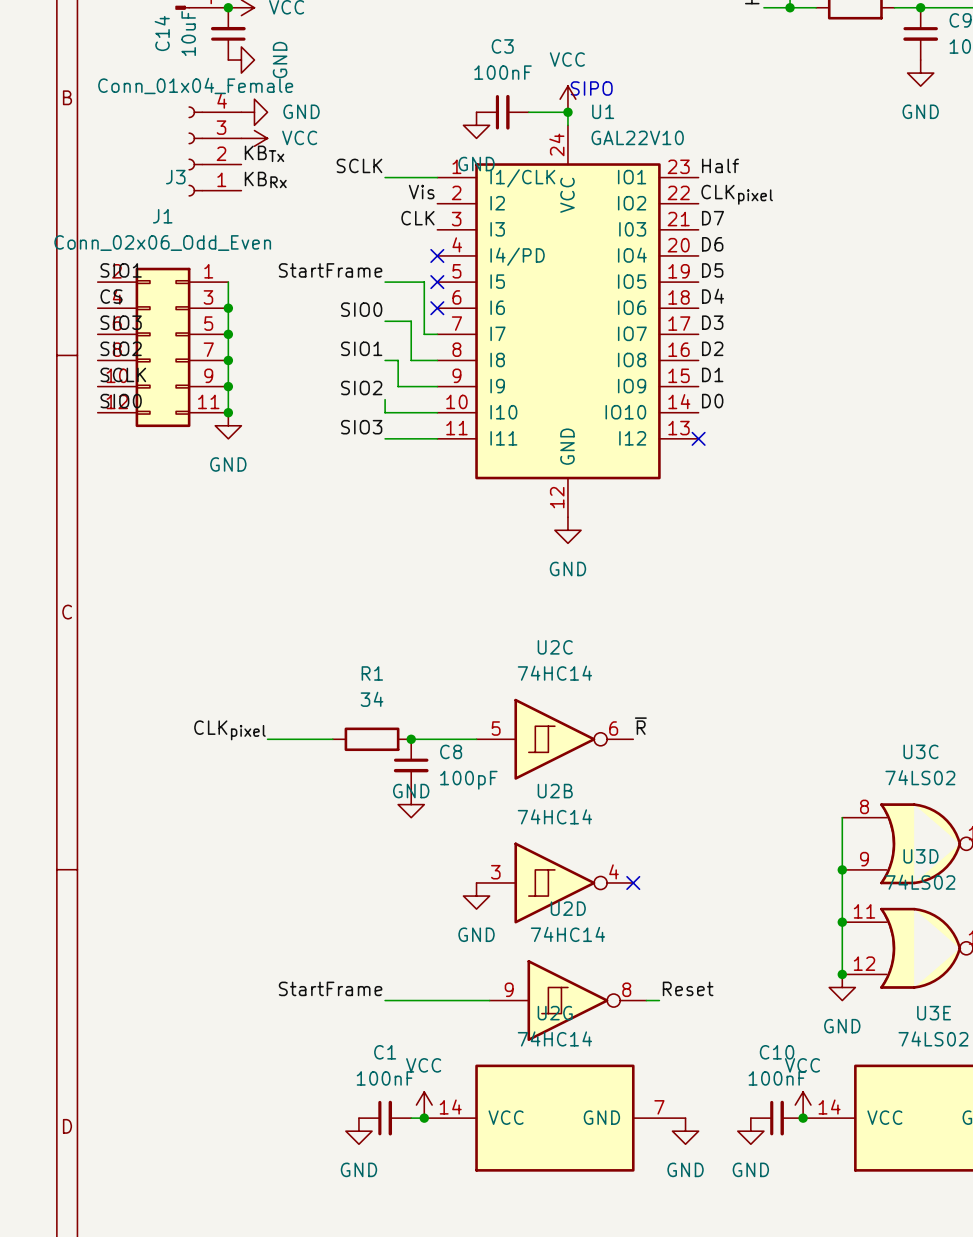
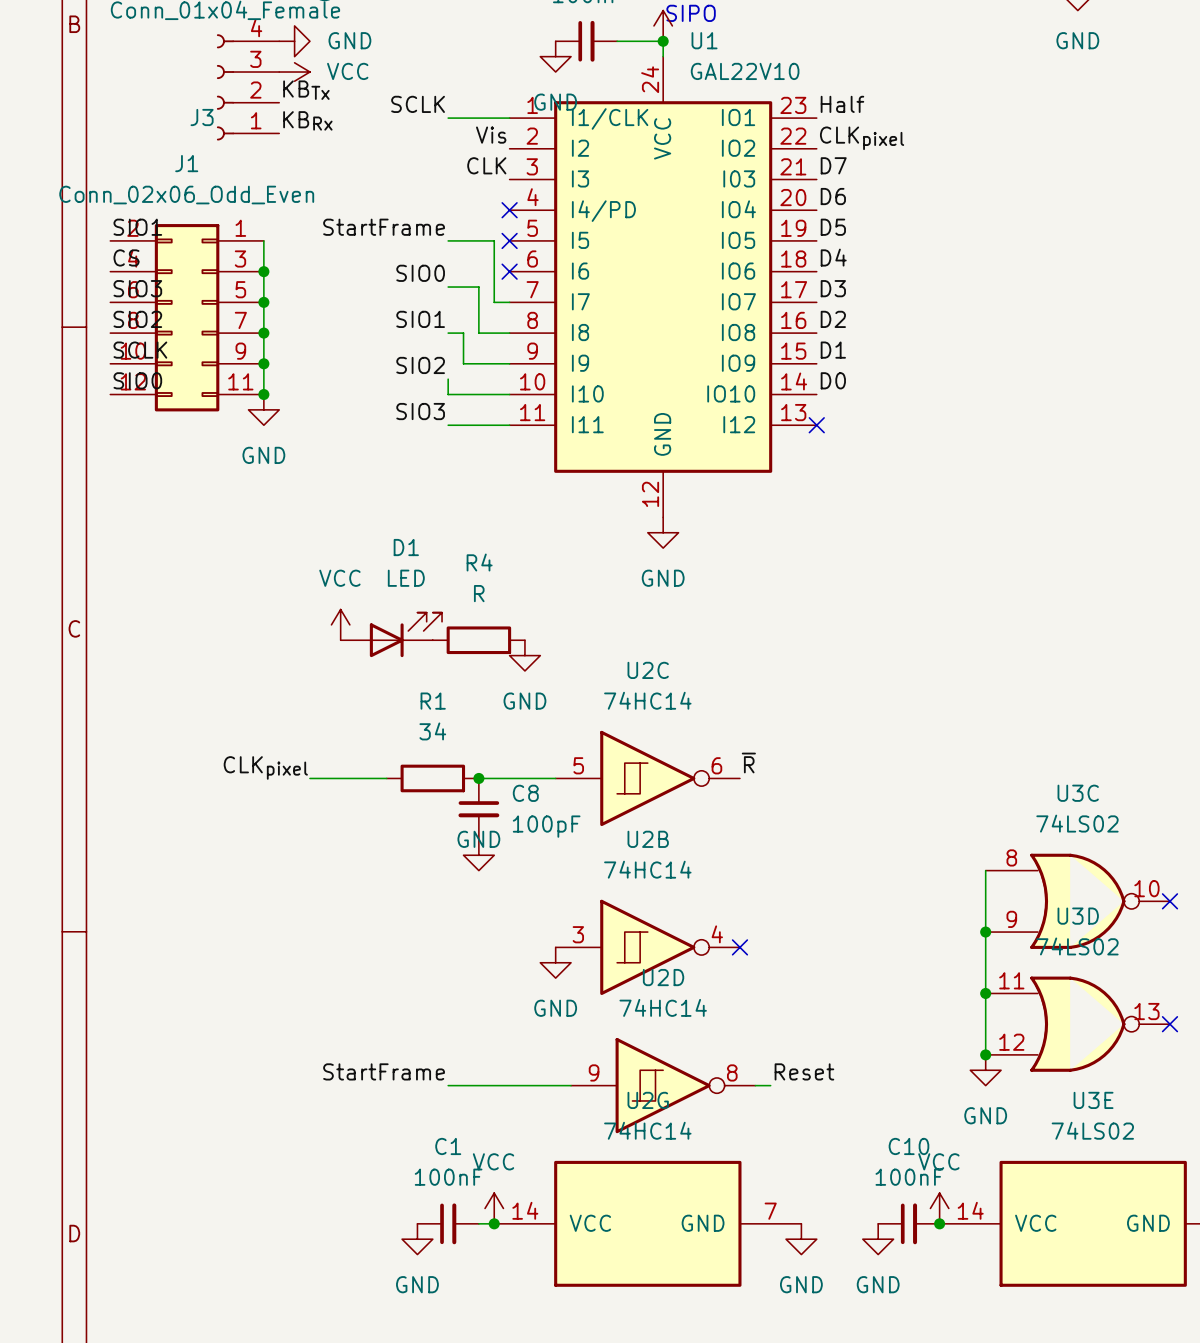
power symbol: none -> VCC (340, 624)
D1: none -> LED (391, 634)
R4: none -> R (478, 640)
power symbol: none -> GND (524, 655)

